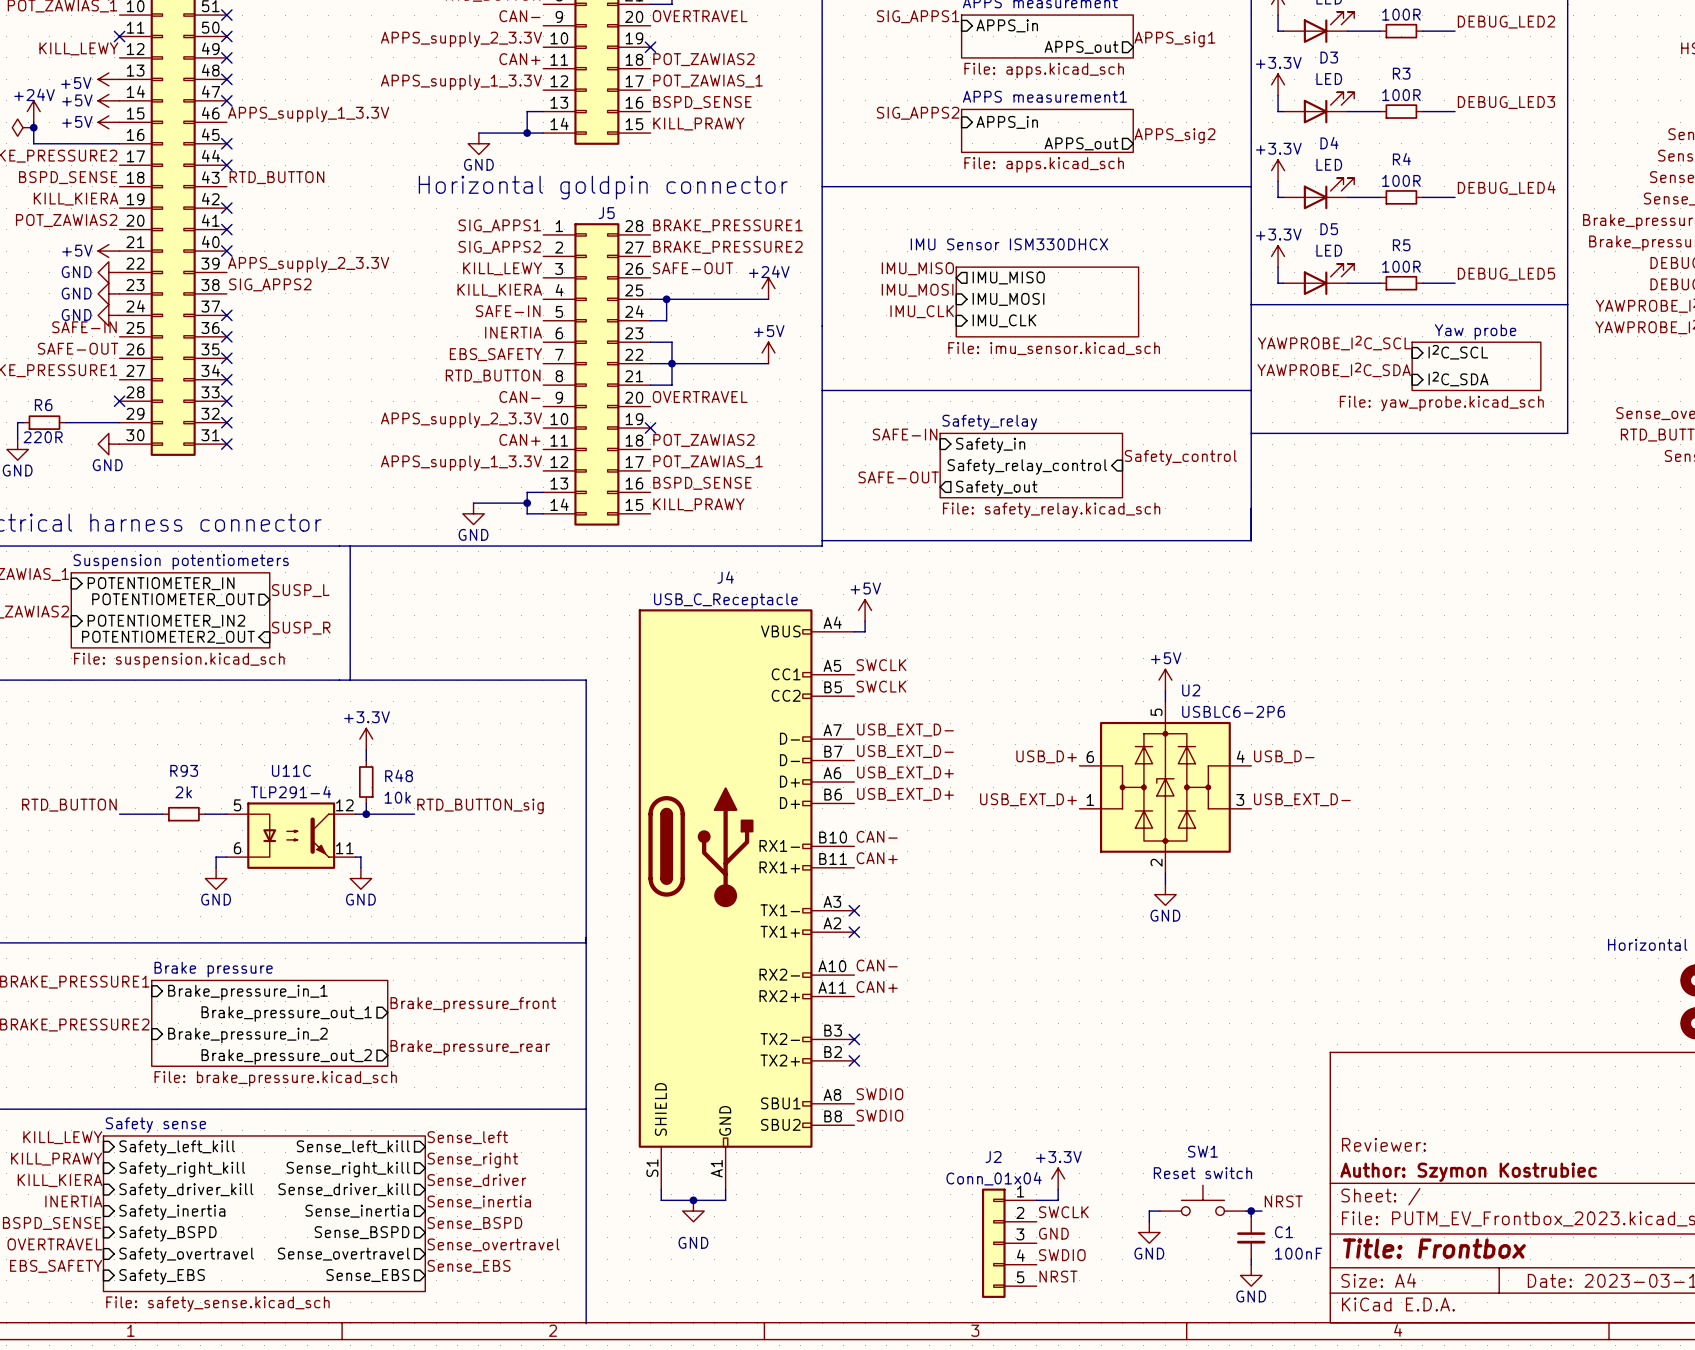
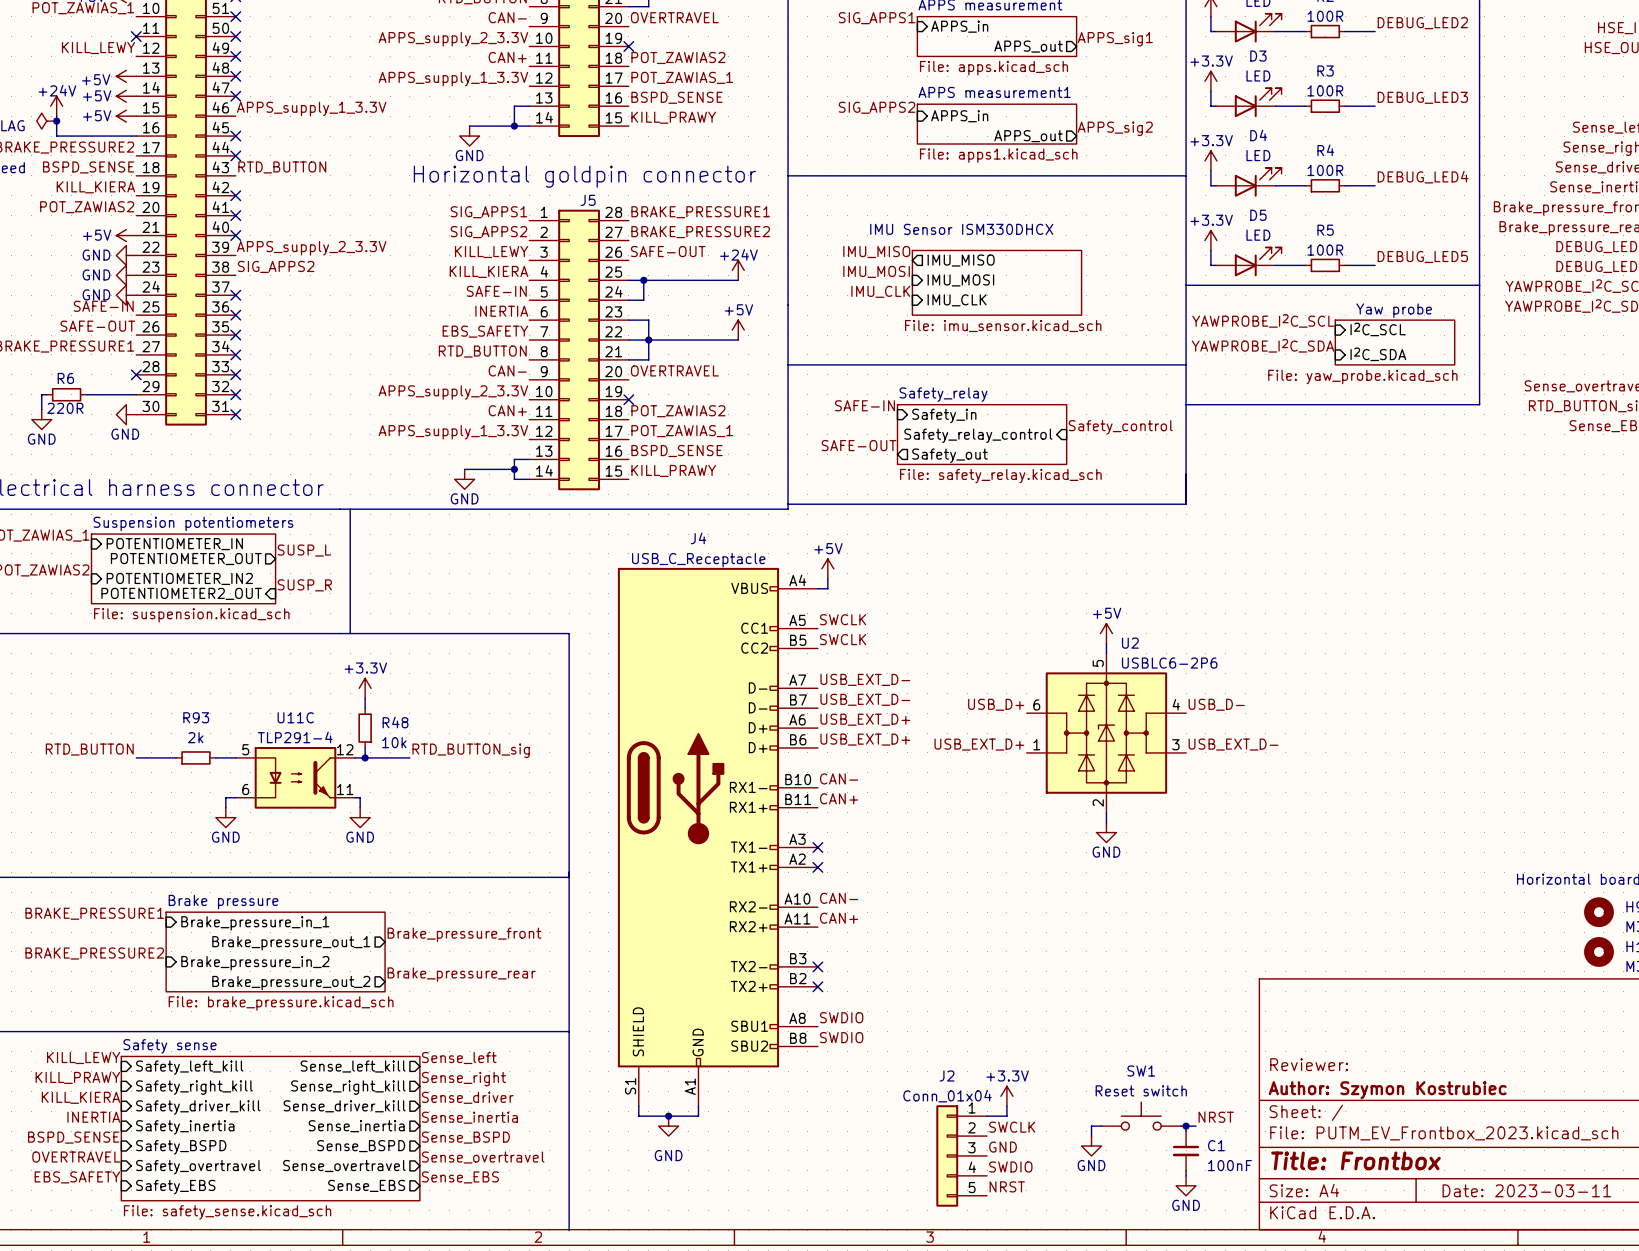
sheet APPS measurement1 value: File: apps.kicad_sch (1044, 164) -> File: apps1.kicad_sch (998, 155)

